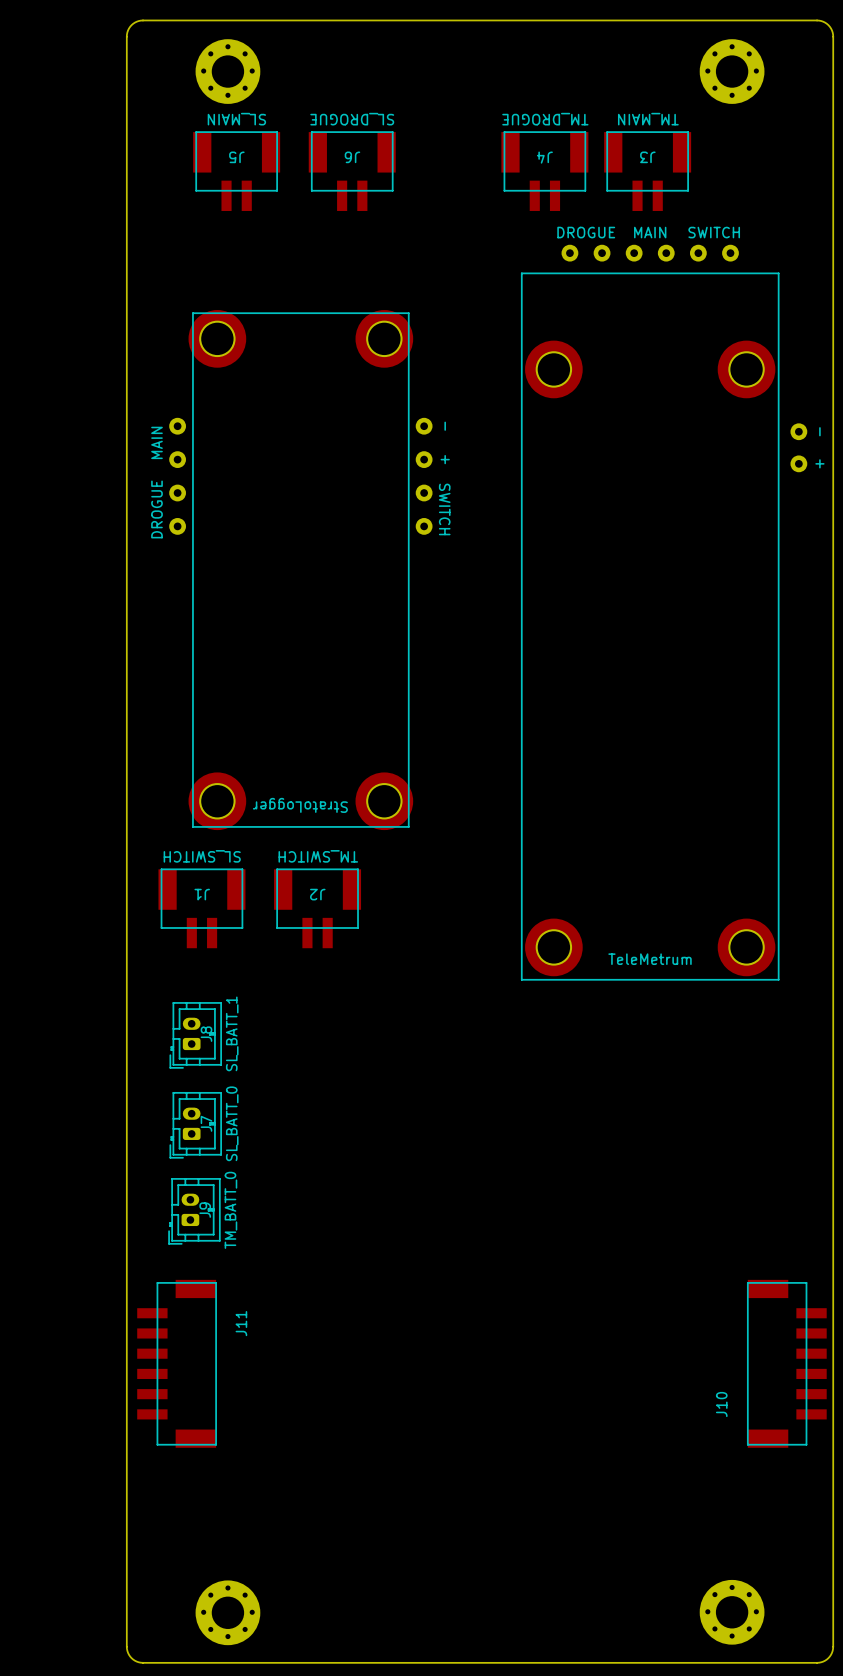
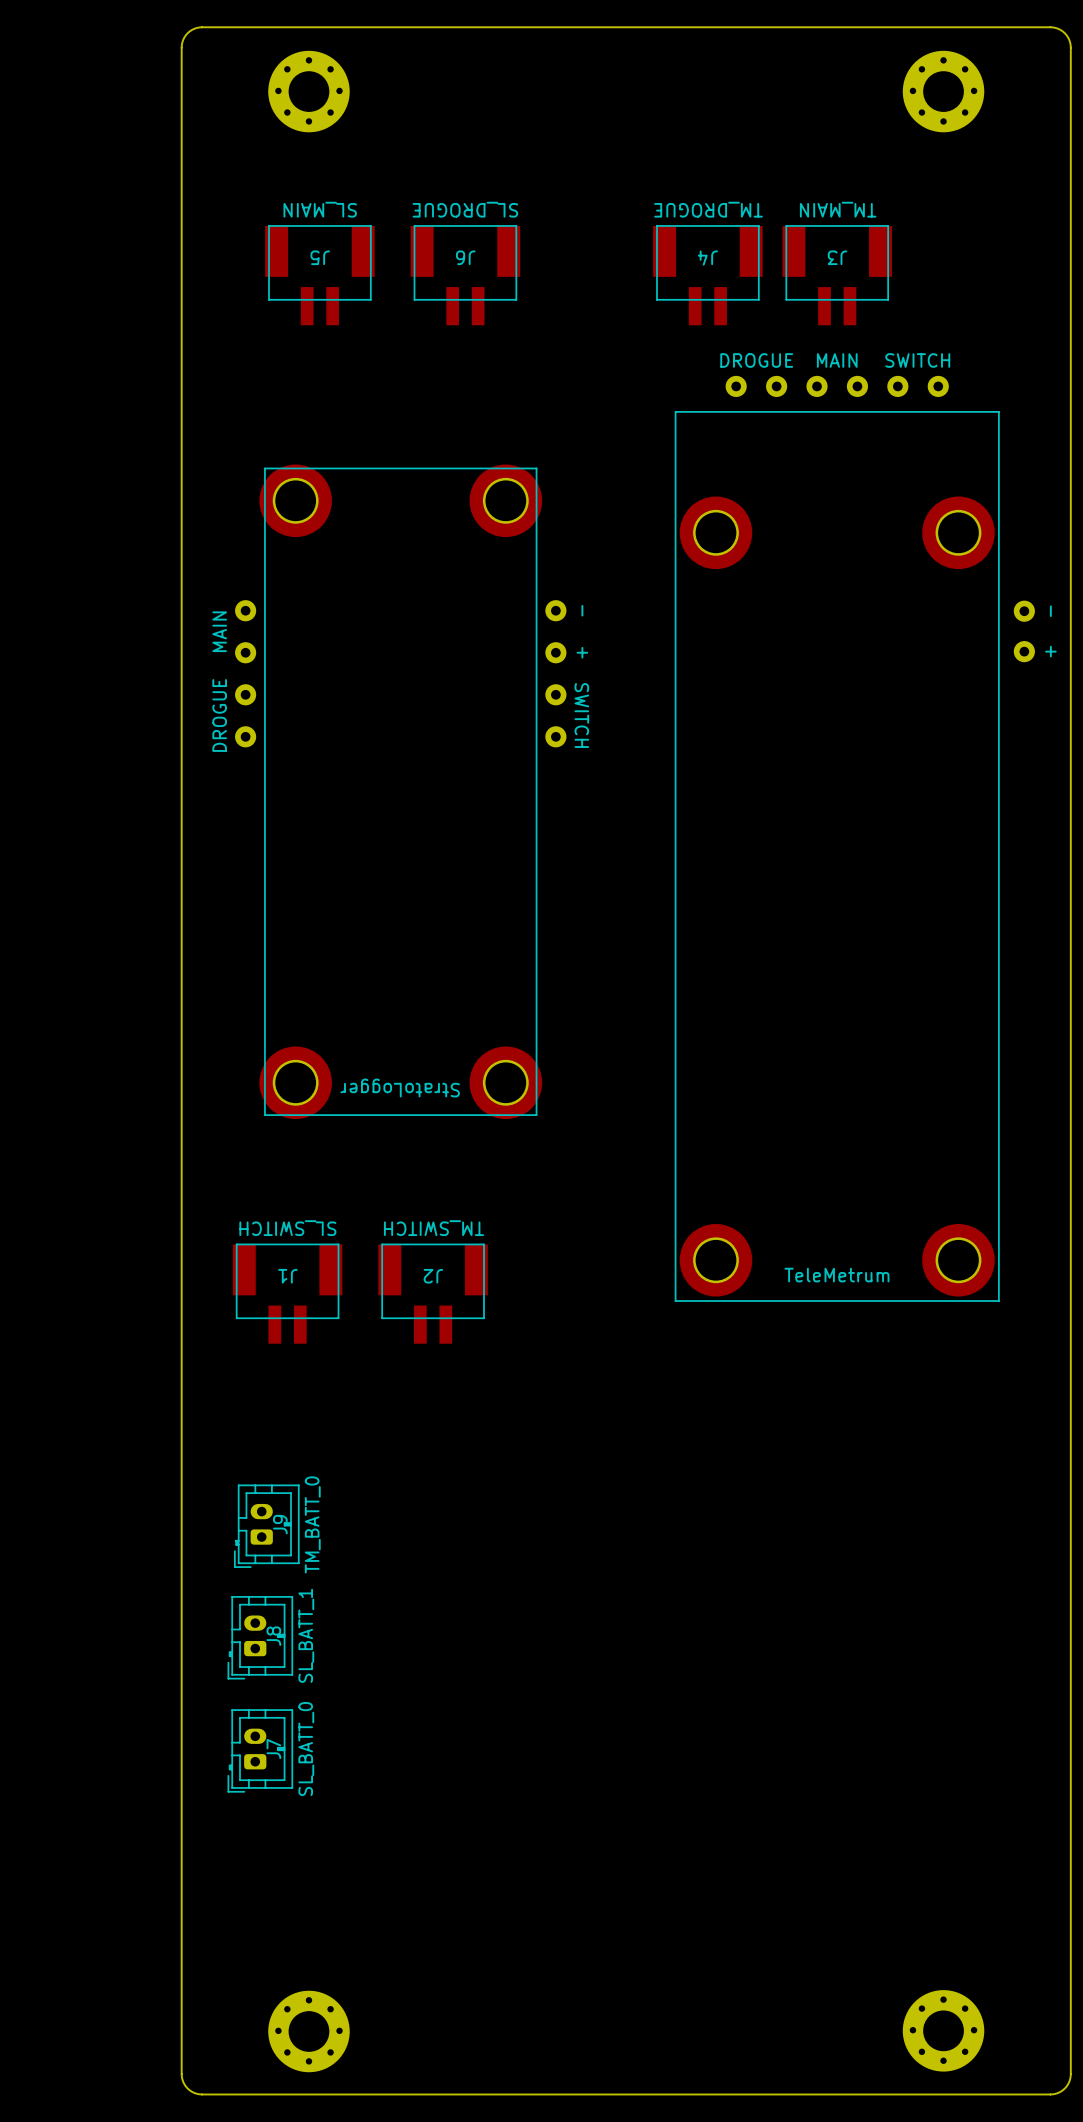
J5 position: (236, 171) -> (319, 275)
J6 position: (352, 171) -> (465, 275)
J4 position: (544, 171) -> (707, 275)
J3 position: (647, 171) -> (837, 275)
part position: (300, 570) -> (400, 791)
part position: (664, 612) -> (854, 838)
J1 position: (201, 908) -> (287, 1293)
J2 position: (317, 908) -> (433, 1293)
J8 position: (195, 1035) -> (260, 1637)
J7 position: (195, 1125) -> (260, 1750)
J11: (176, 1363) -> none
J10: (786, 1363) -> none

